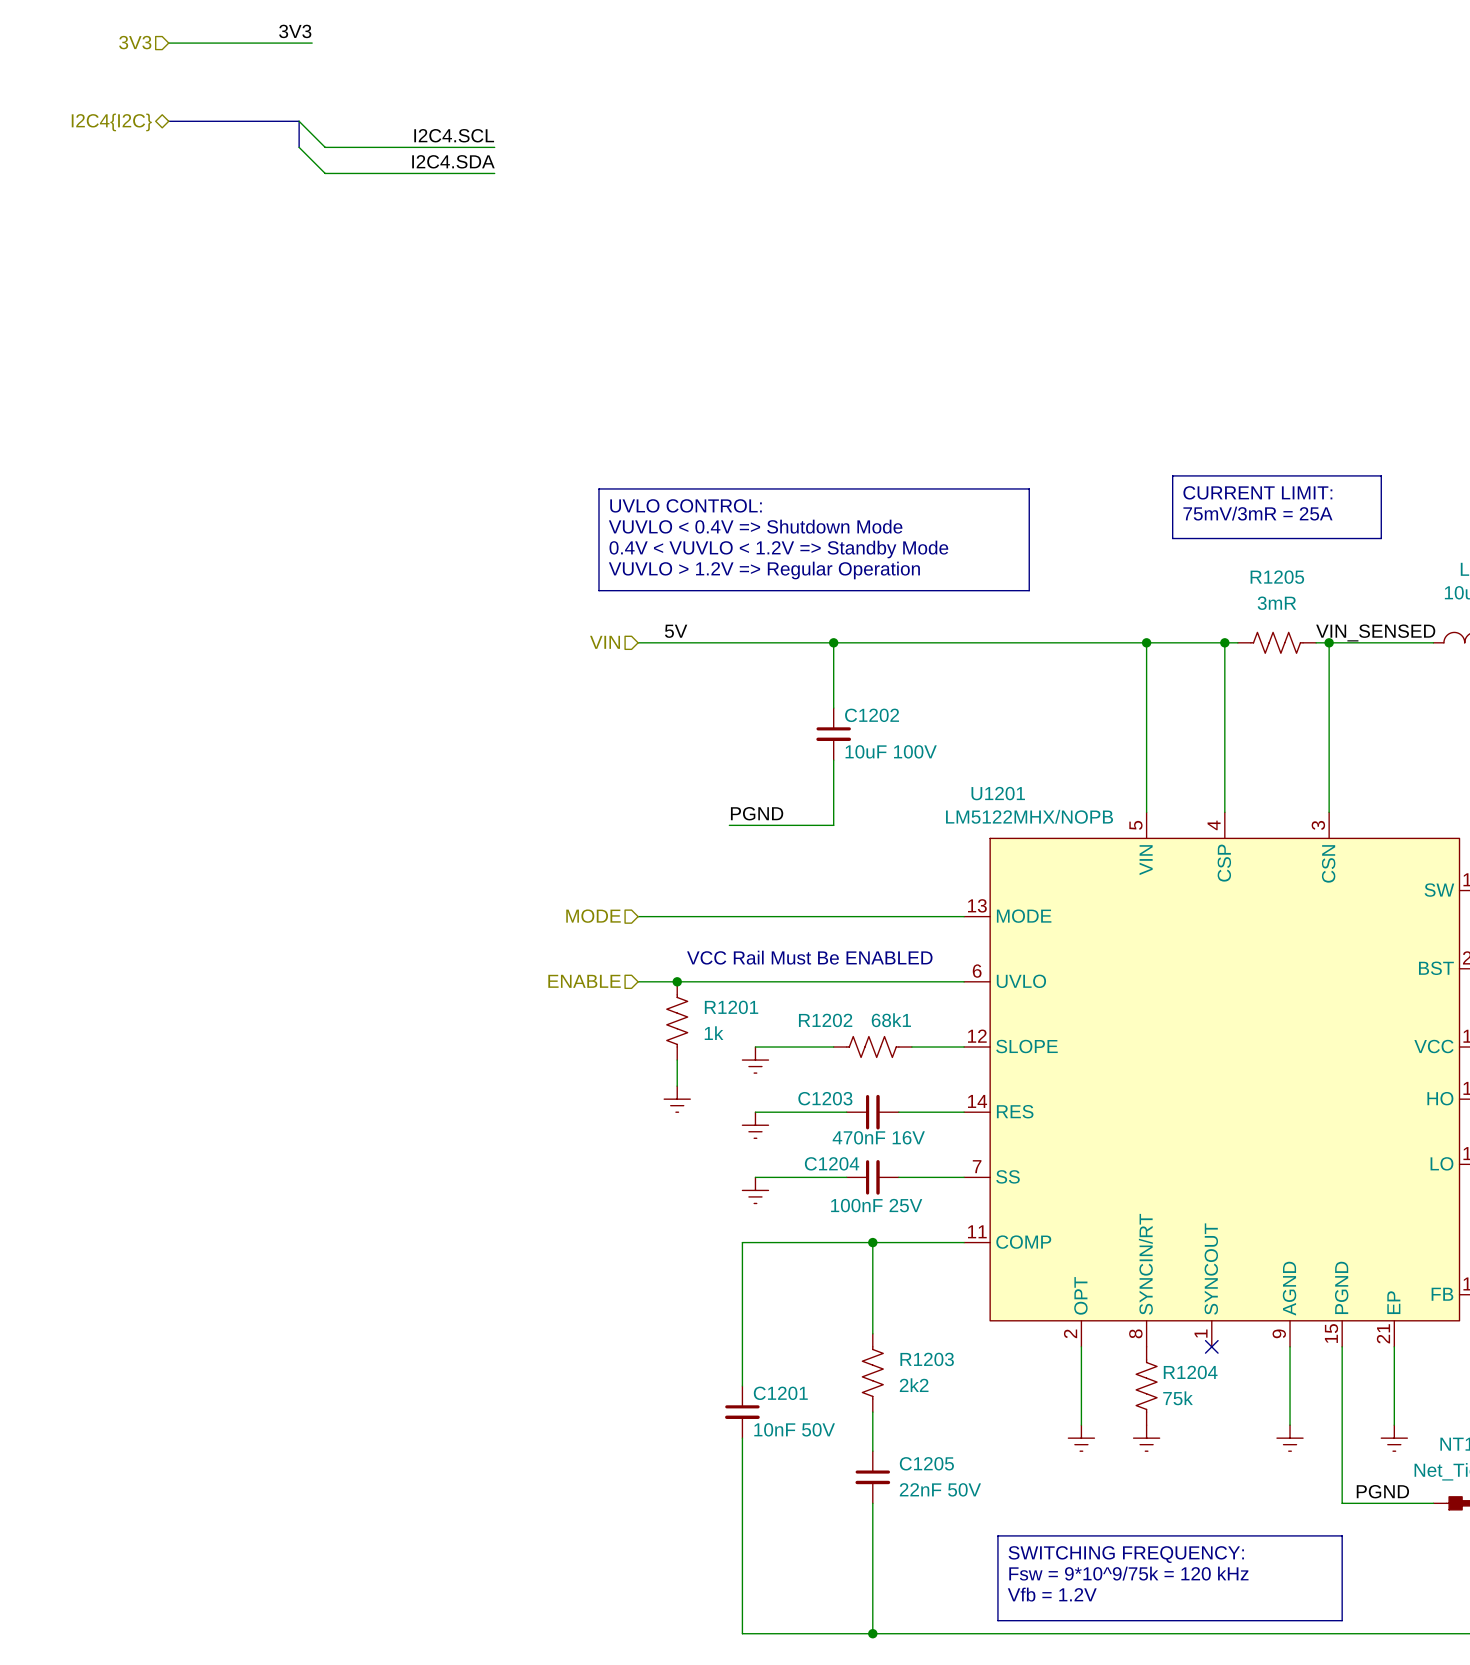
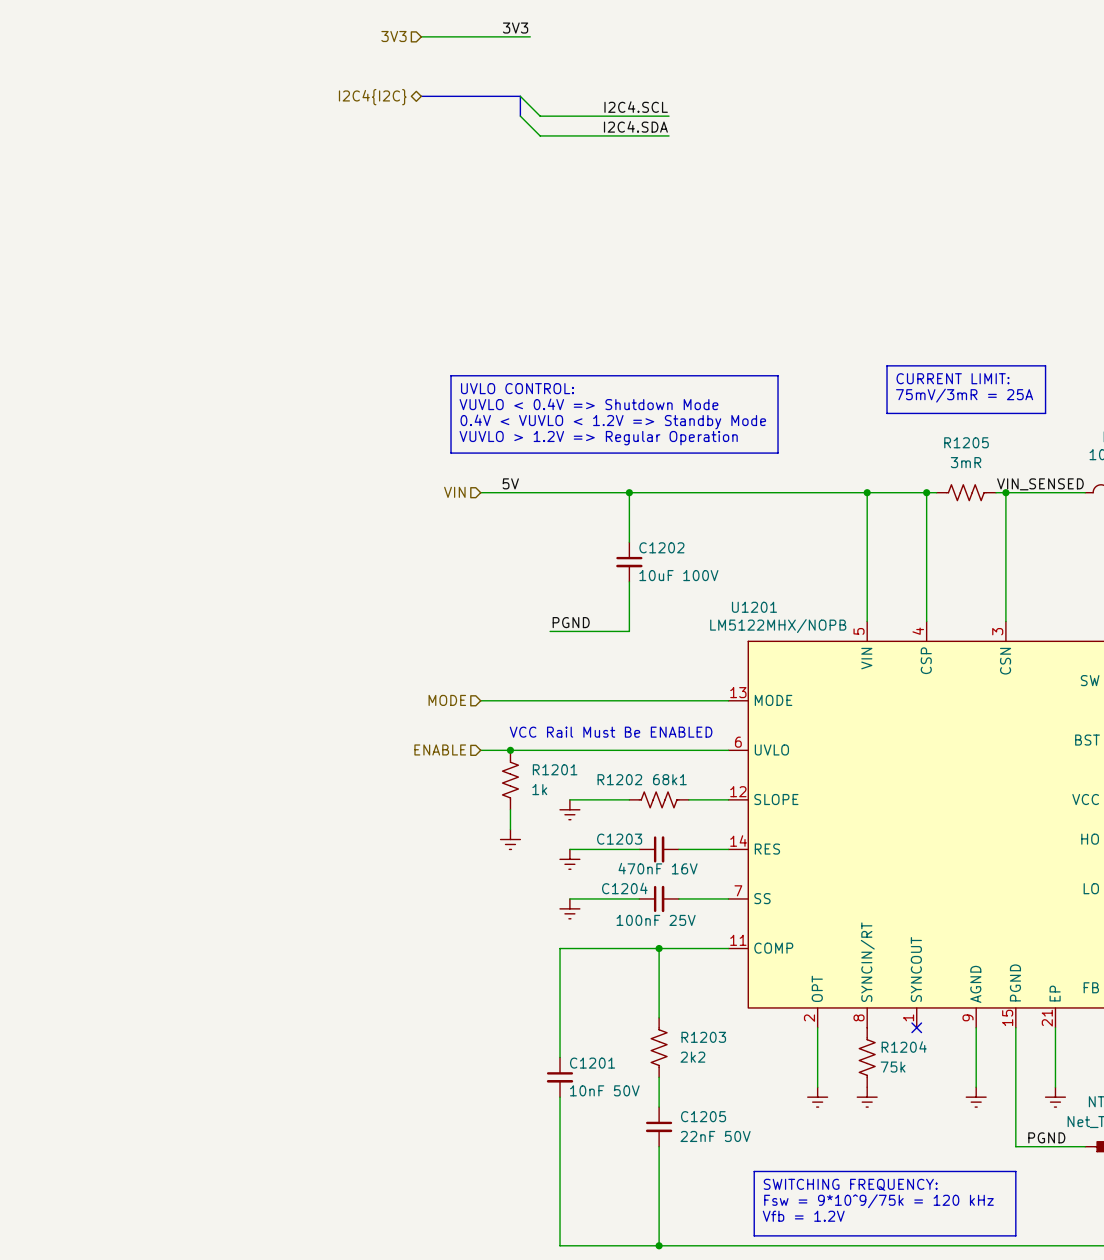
label: 3V3 (295, 31) -> none
label: none -> 3V3 (515, 28)
hierarchical label: 3V3 (135, 42) -> none
hierarchical label: none -> 3V3 (393, 36)
wire: (168, 43) (312, 43) -> none
wire: none -> (421, 36) (530, 36)
bus: (168, 121) (299, 121) (299, 147) -> none
wire: (299, 121) (325, 147) (494, 147) -> none
bus: none -> (421, 96) (520, 96) (520, 116)
wire: none -> (520, 96) (540, 116) (669, 116)
hierarchical label: I2C4{I2C} (111, 122) -> none
hierarchical label: none -> I2C4{I2C} (372, 97)
label: I2C4.SCL (454, 135) -> none
label: none -> I2C4.SCL (636, 107)
wire: (299, 147) (325, 173) (494, 173) -> none
wire: none -> (520, 116) (540, 135) (669, 135)
label: I2C4.SDA (453, 161) -> none
label: none -> I2C4.SDA (635, 126)

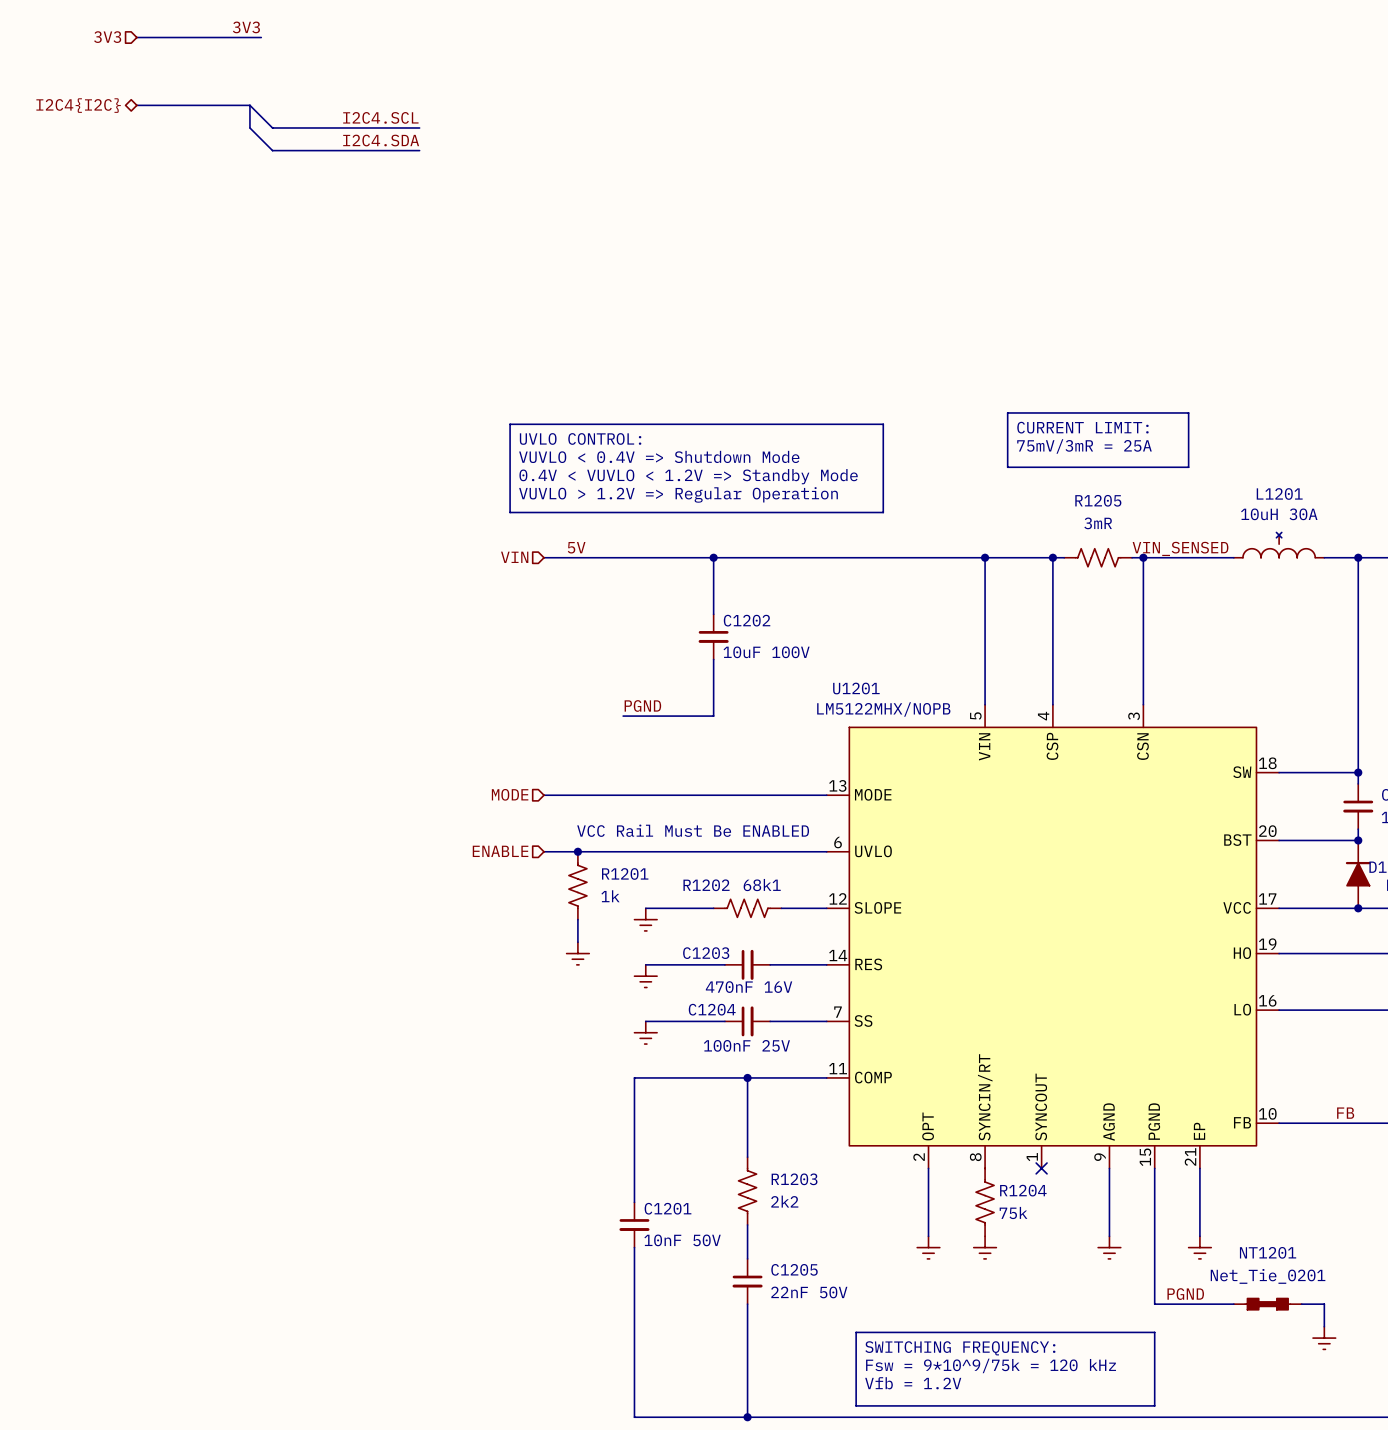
label: none -> 3V3 (246, 27)
label: 3V3 (515, 28) -> none
hierarchical label: none -> 3V3 (107, 37)
wire: none -> (136, 37) (261, 37)
hierarchical label: 3V3 (393, 36) -> none
wire: (421, 36) (530, 36) -> none
bus: none -> (136, 105) (249, 105) (249, 127)
wire: none -> (249, 105) (272, 127) (419, 127)
bus: (421, 96) (520, 96) (520, 116) -> none
wire: (520, 96) (540, 116) (669, 116) -> none
hierarchical label: none -> I2C4{I2C} (78, 105)
hierarchical label: I2C4{I2C} (372, 97) -> none
label: none -> I2C4.SCL (380, 117)
label: I2C4.SCL (636, 107) -> none
wire: none -> (249, 127) (272, 150) (419, 150)
wire: (520, 116) (540, 135) (669, 135) -> none
label: none -> I2C4.SDA (381, 140)
label: I2C4.SDA (635, 126) -> none

